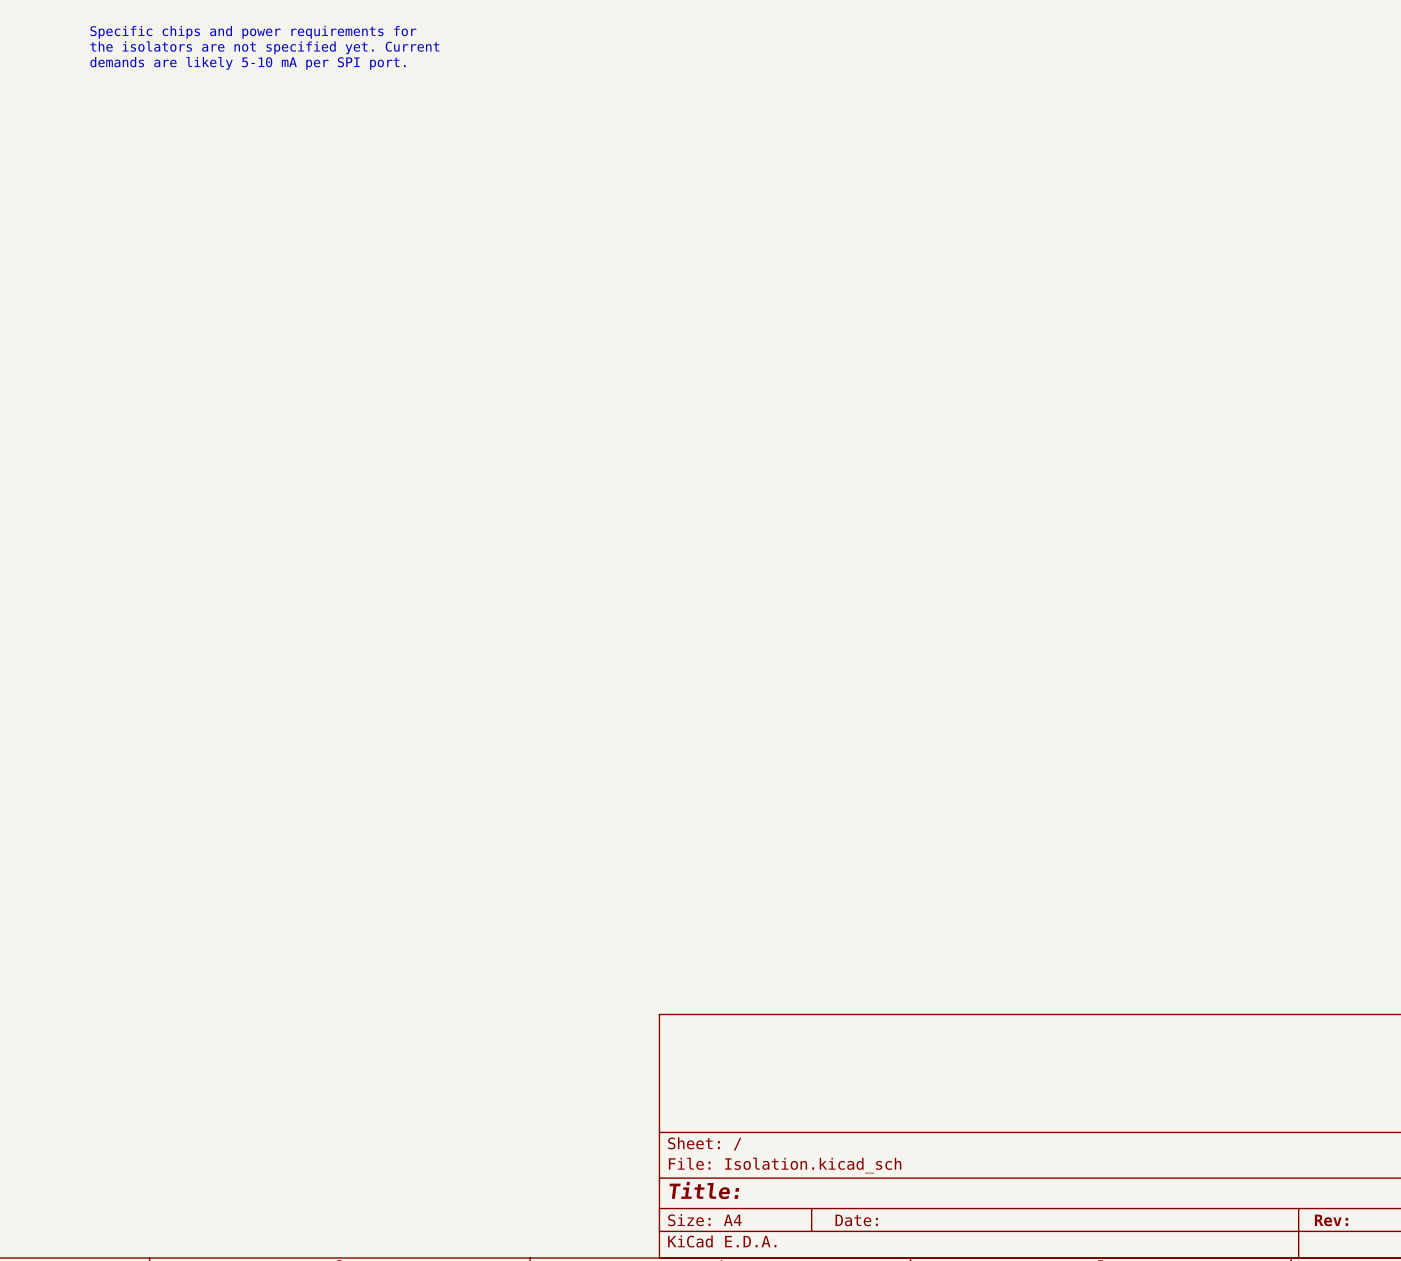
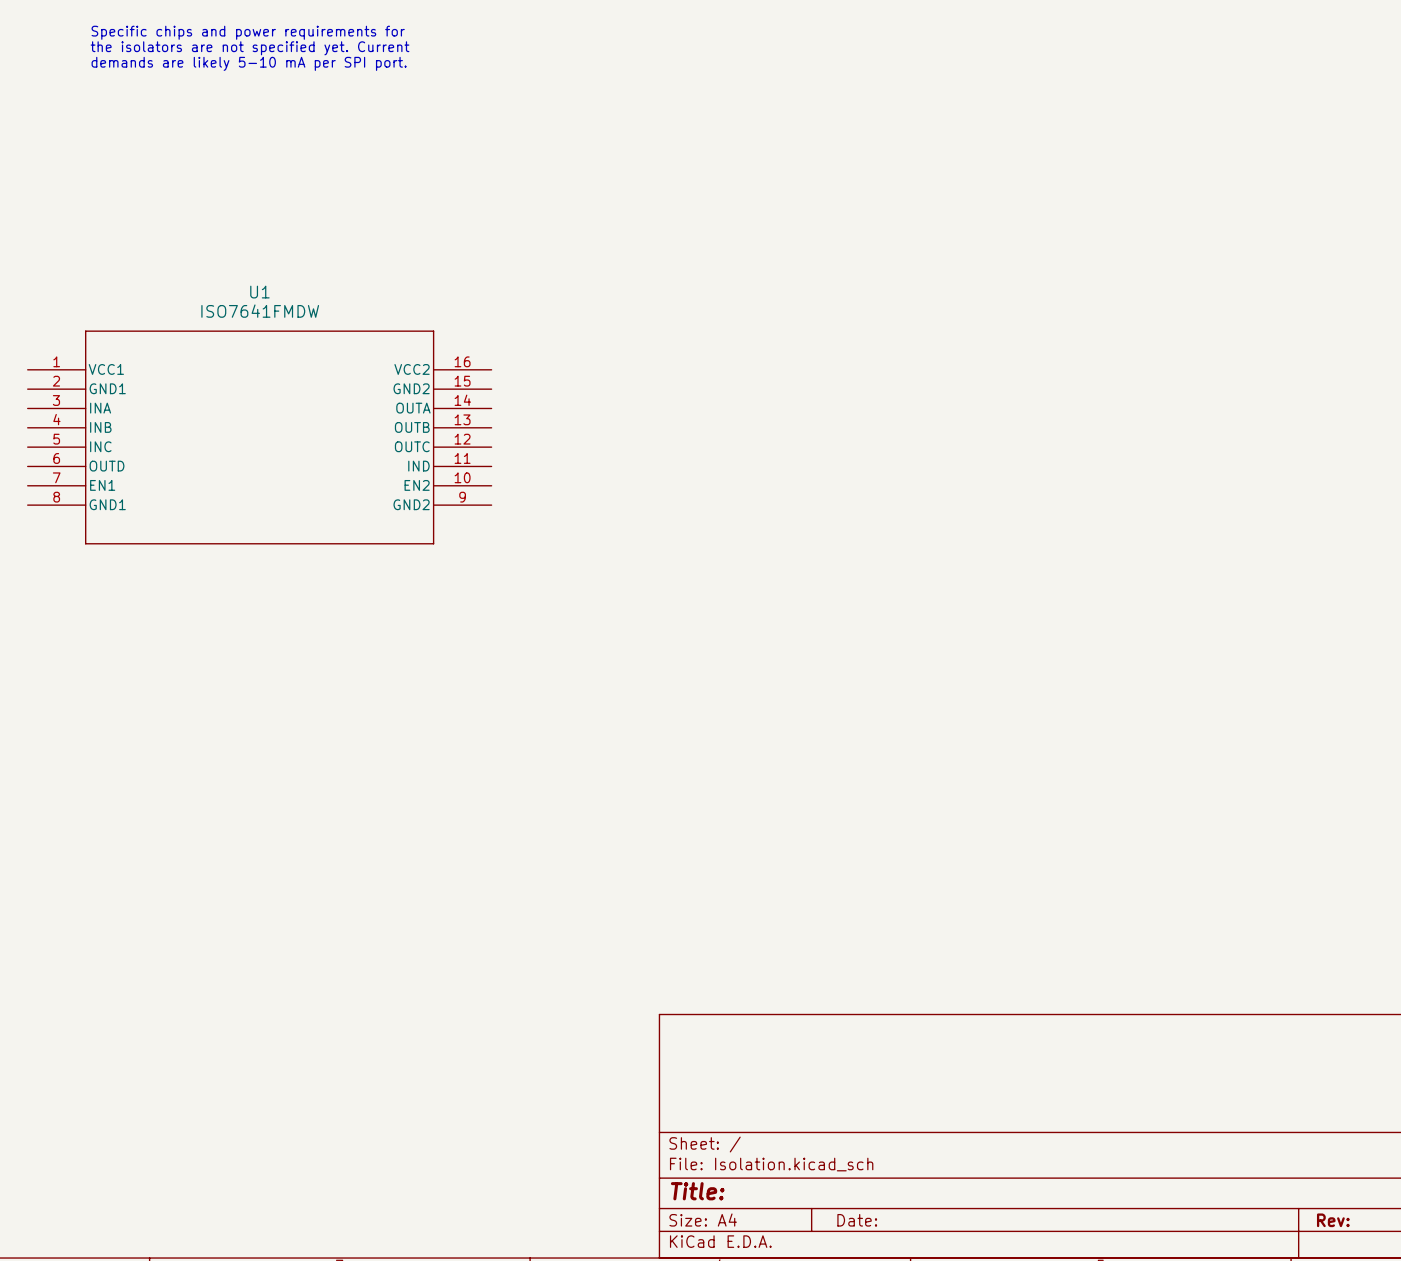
U1: none -> ISO7641FMDW (259, 437)

